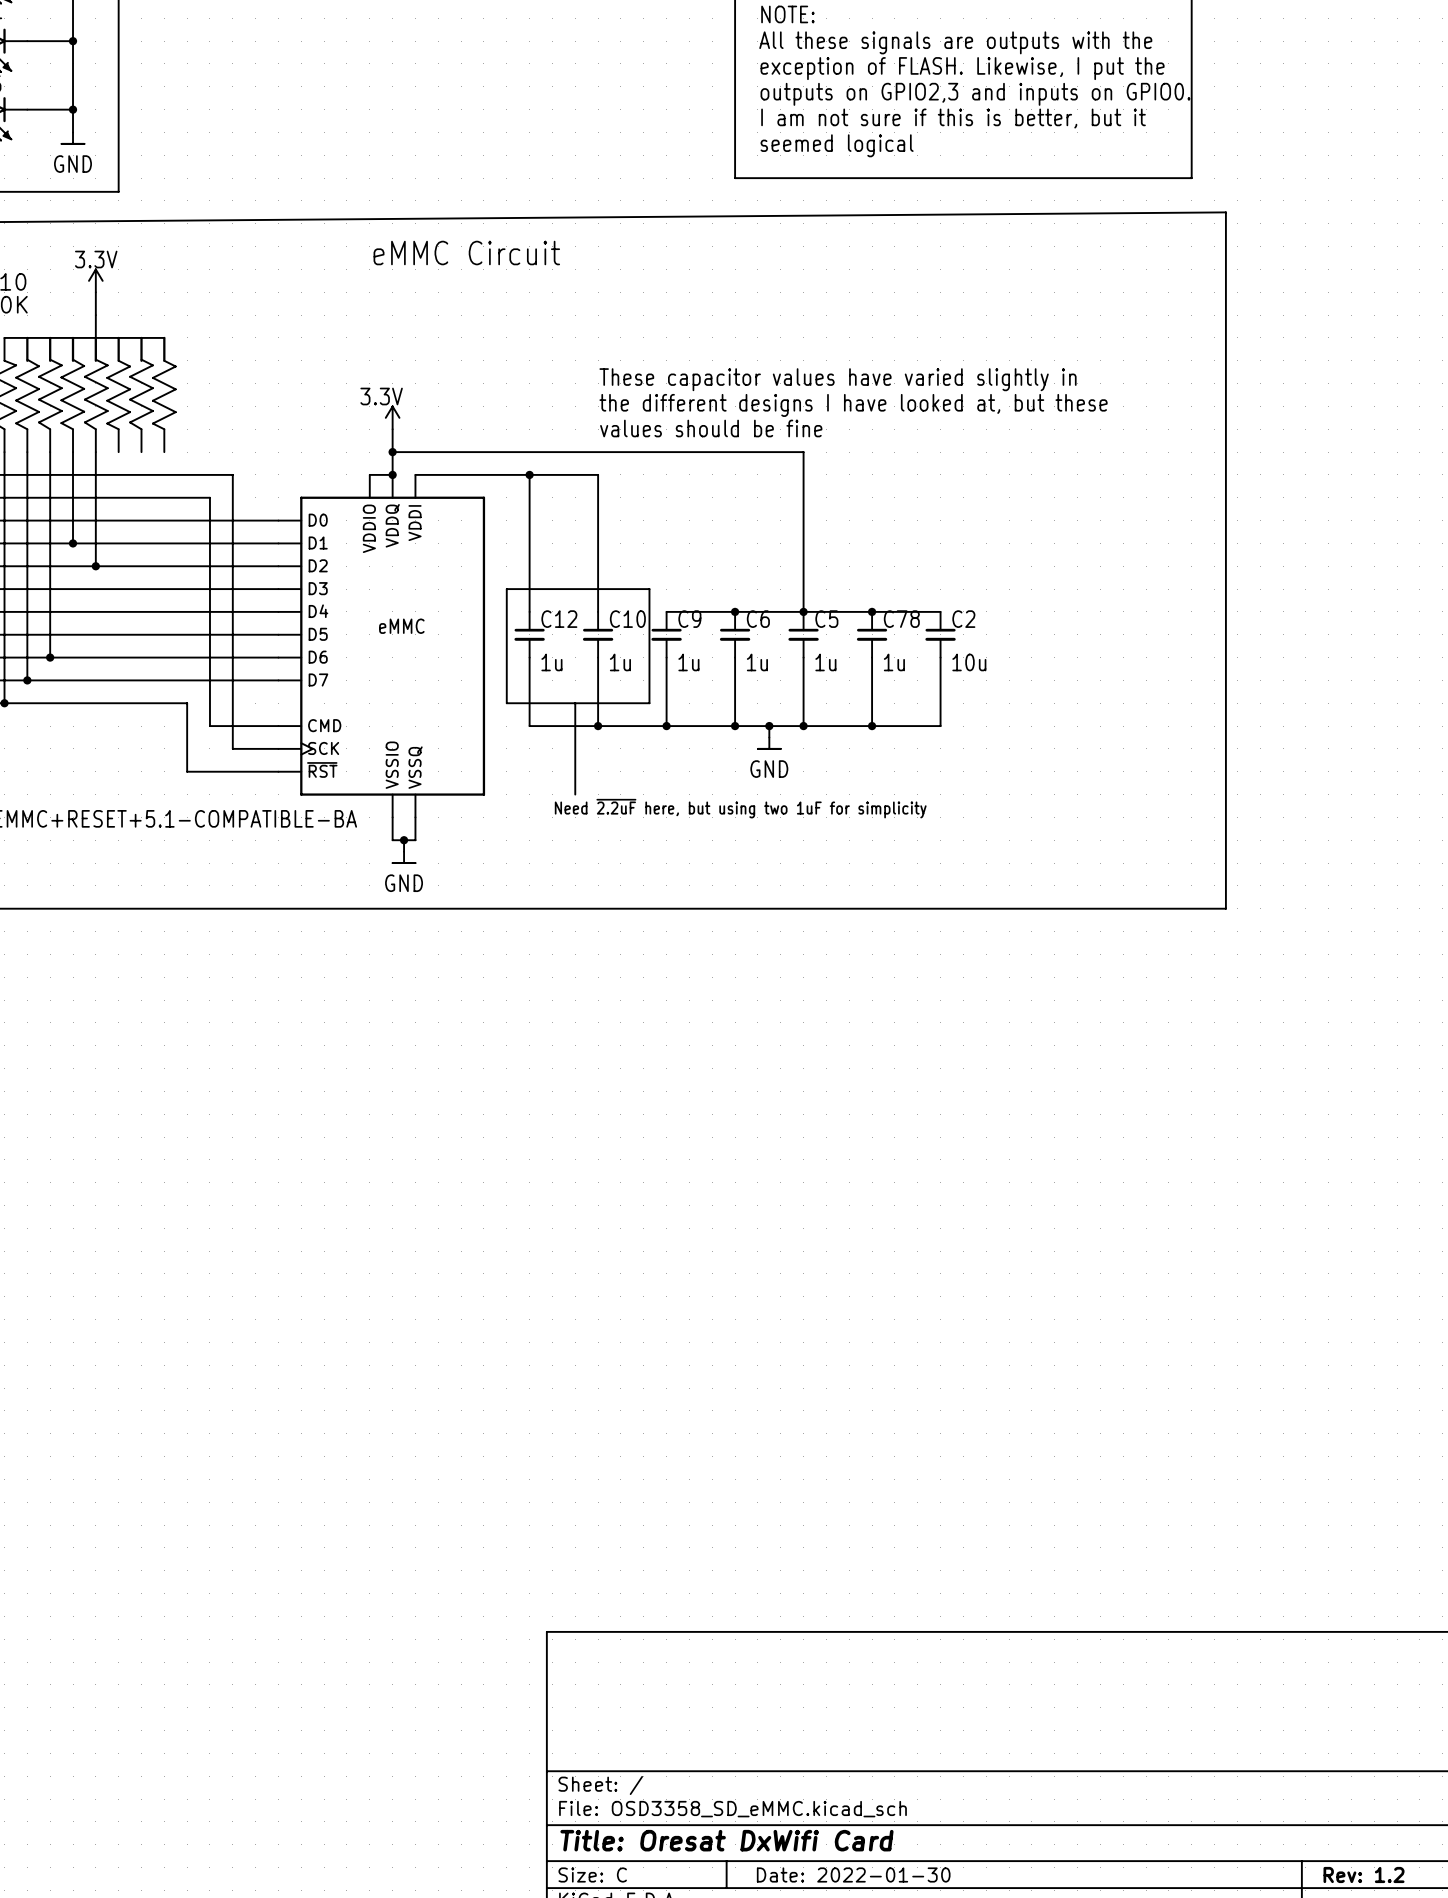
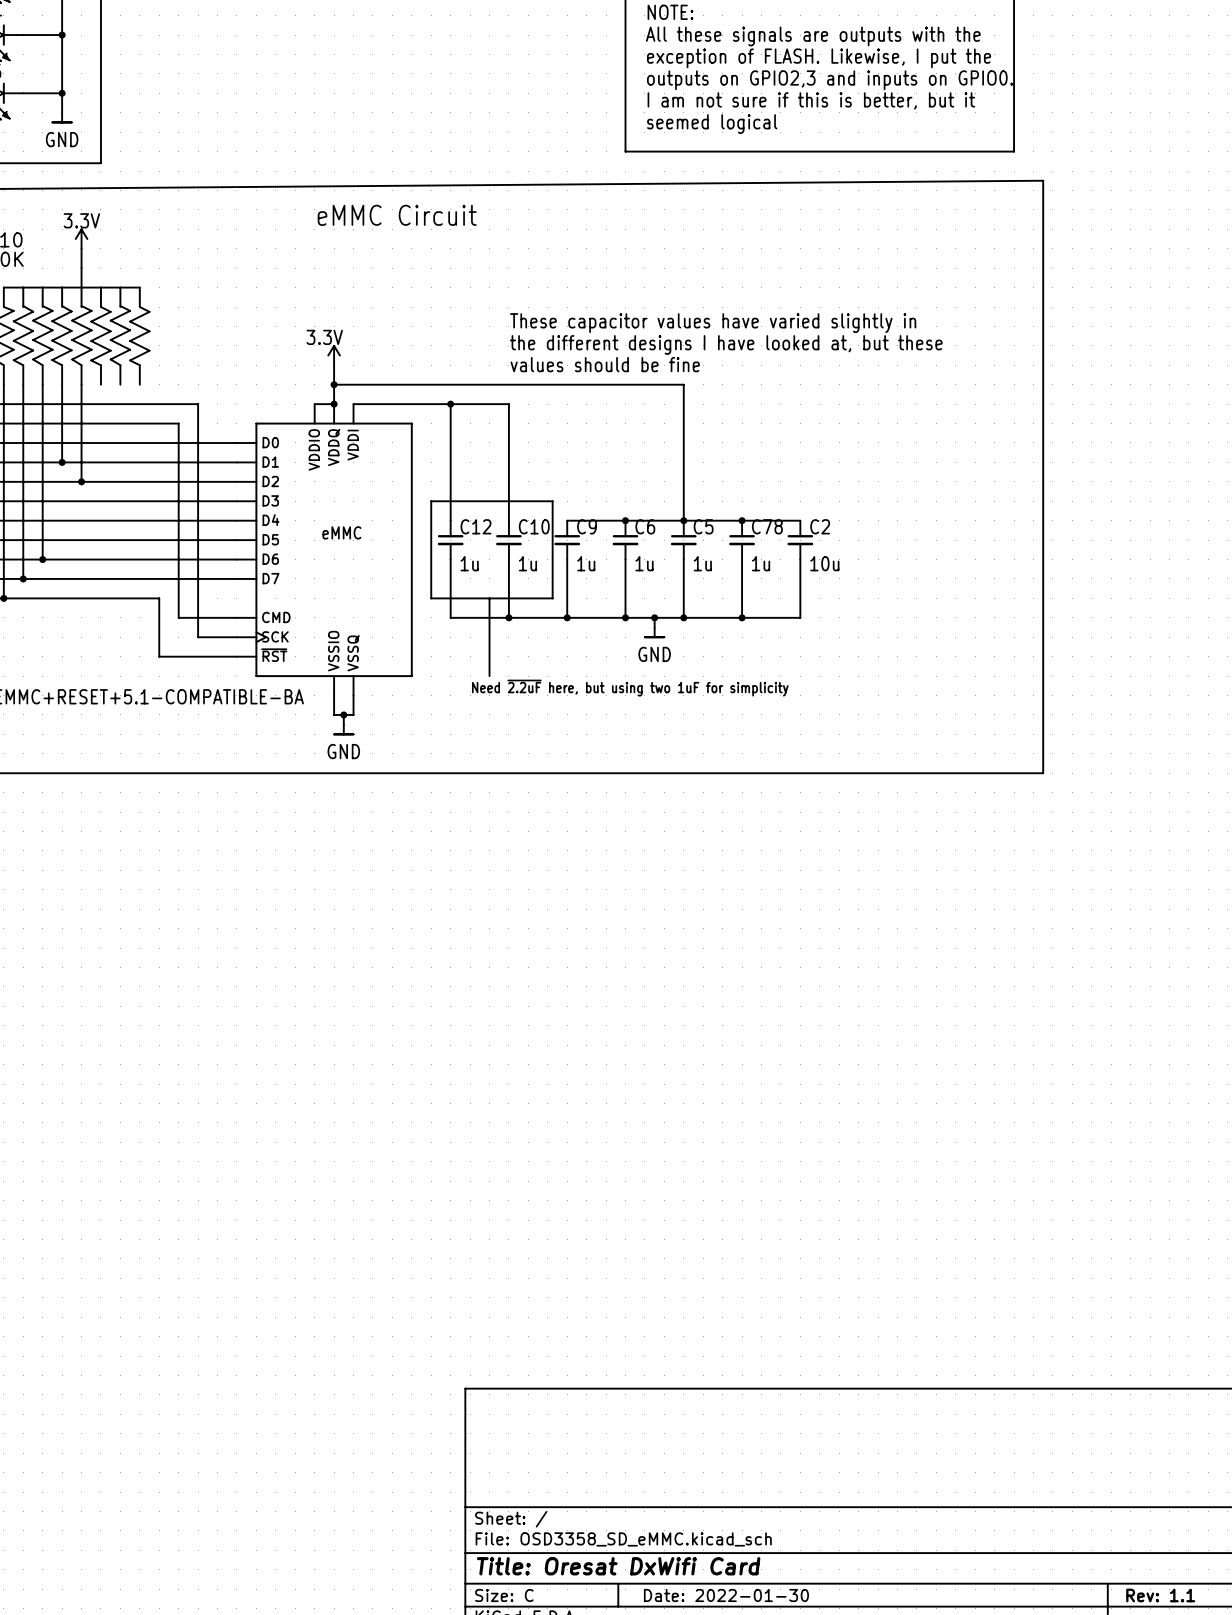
title block: Rev: 1.2 (1364, 1874) -> Rev: 1.1 (1160, 1595)

